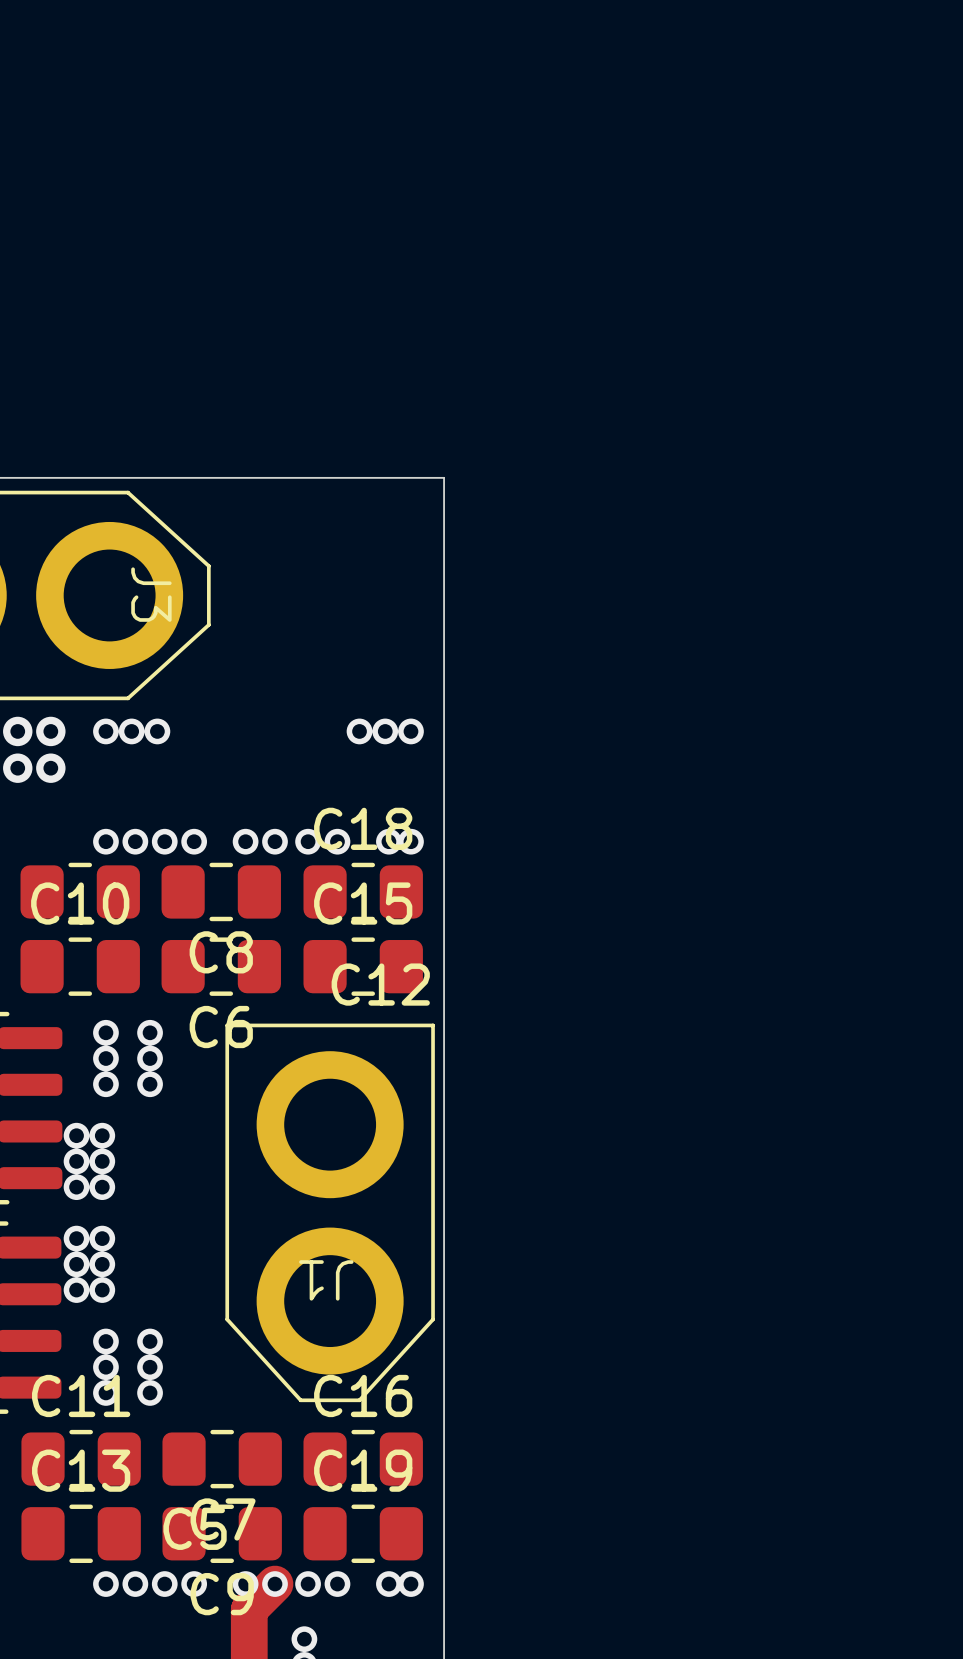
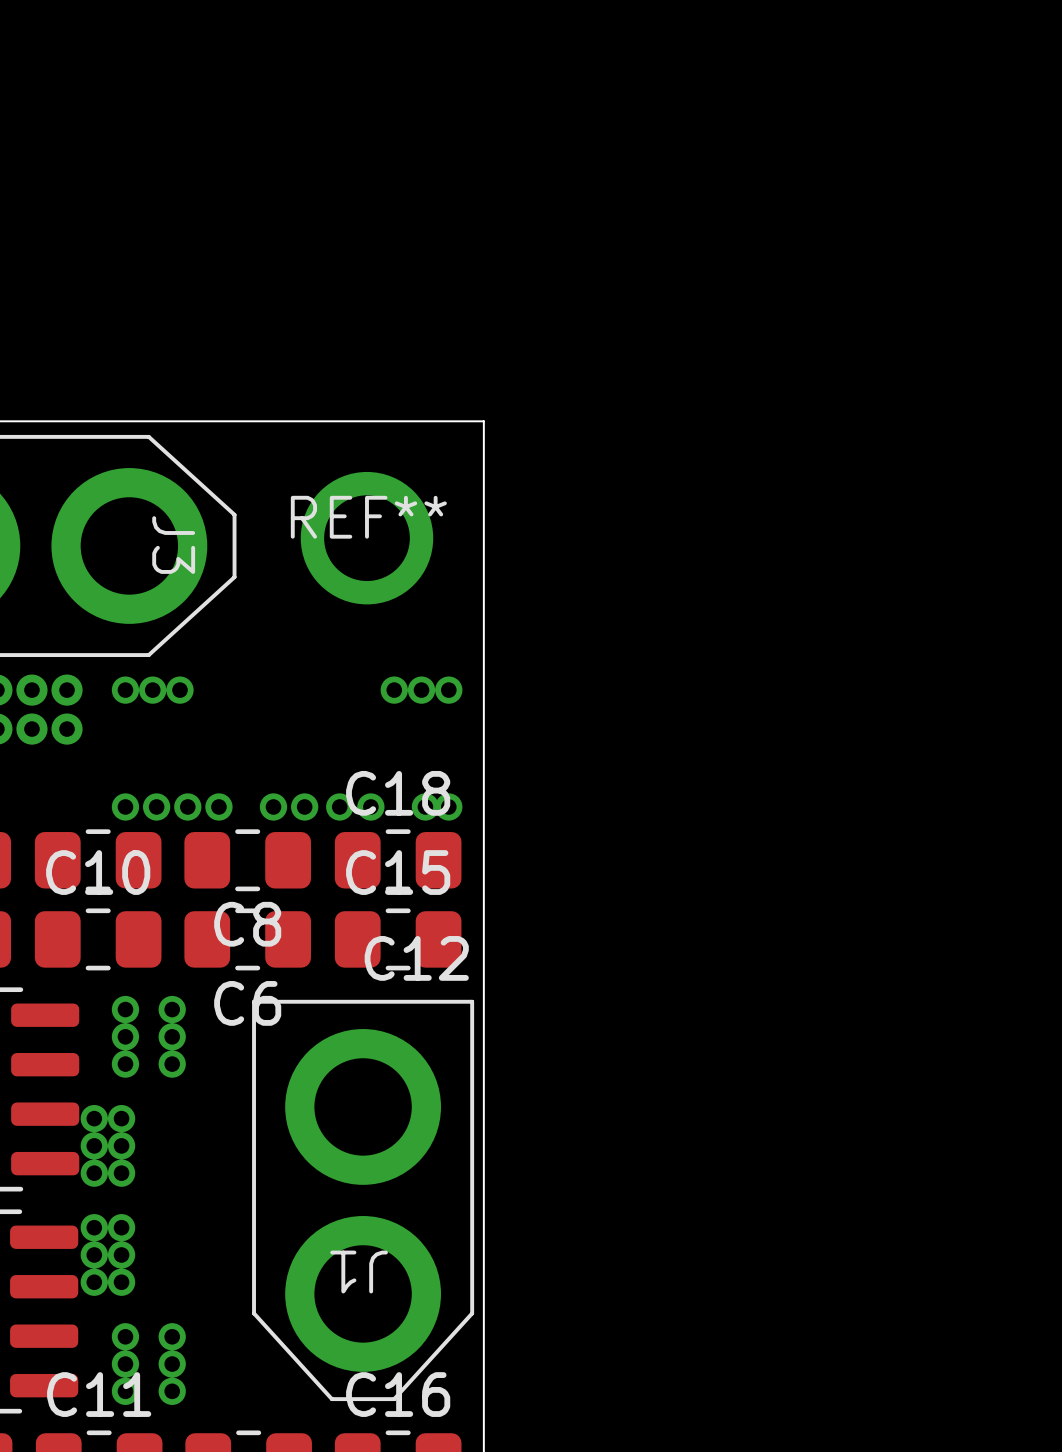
REF**: none -> (366, 538)

